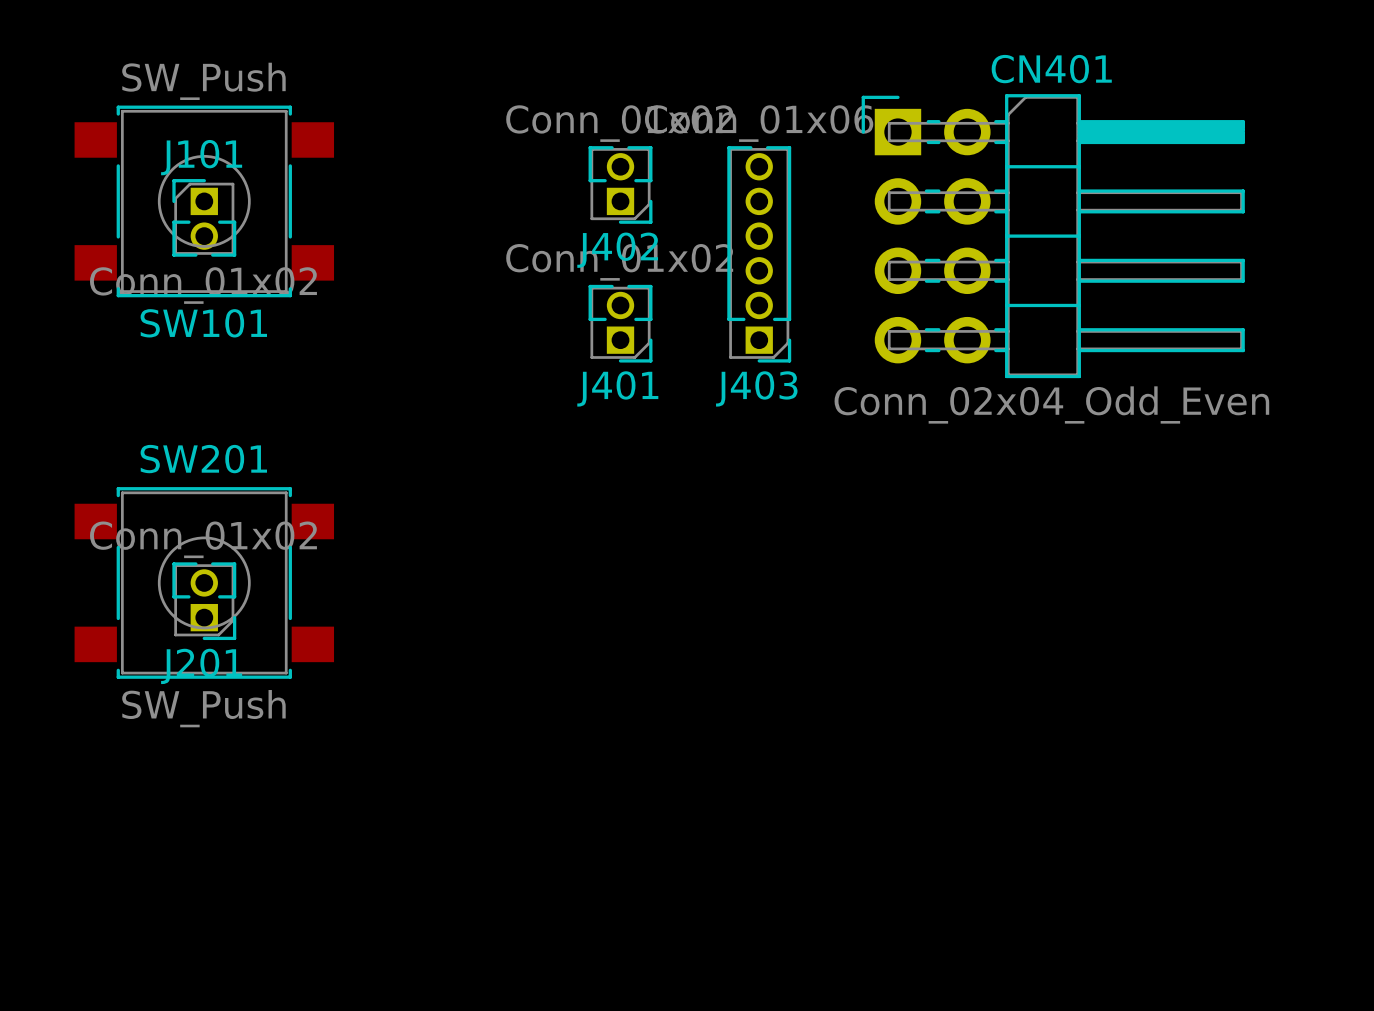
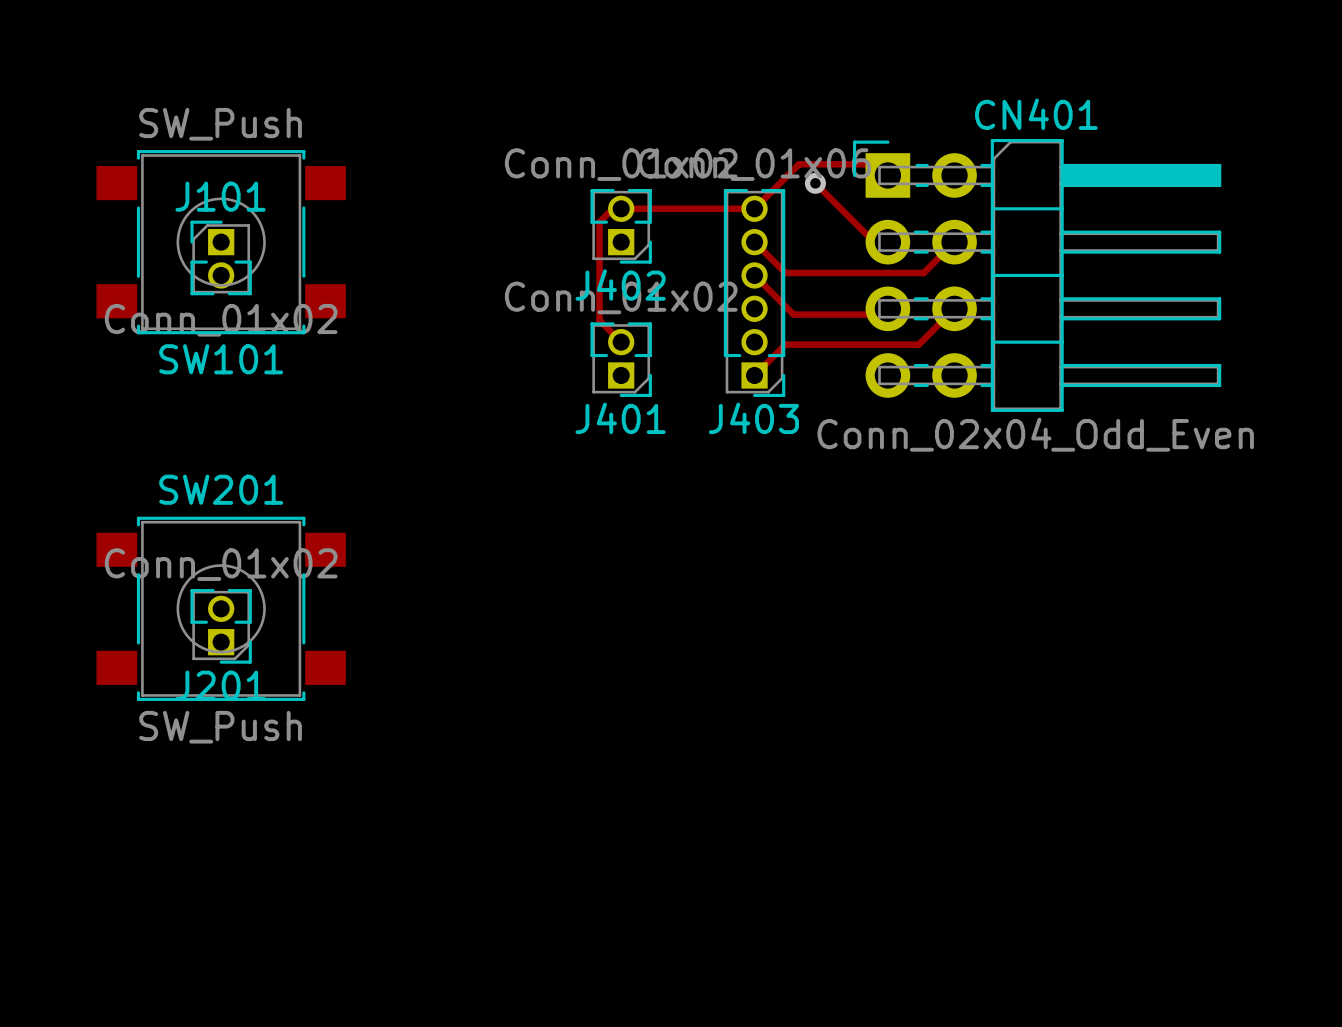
track: none -> (887, 175) (876, 164) (799, 164) (754, 208) (612, 208) (599, 222) (599, 320) (621, 342)
track: none -> (815, 183) (874, 242) (887, 242)
via: none -> (815, 183)
track: none -> (754, 242) (785, 272) (923, 272) (954, 242)
track: none -> (754, 275) (793, 314) (882, 314) (887, 308)
track: none -> (954, 308) (918, 344) (785, 344) (754, 375)

